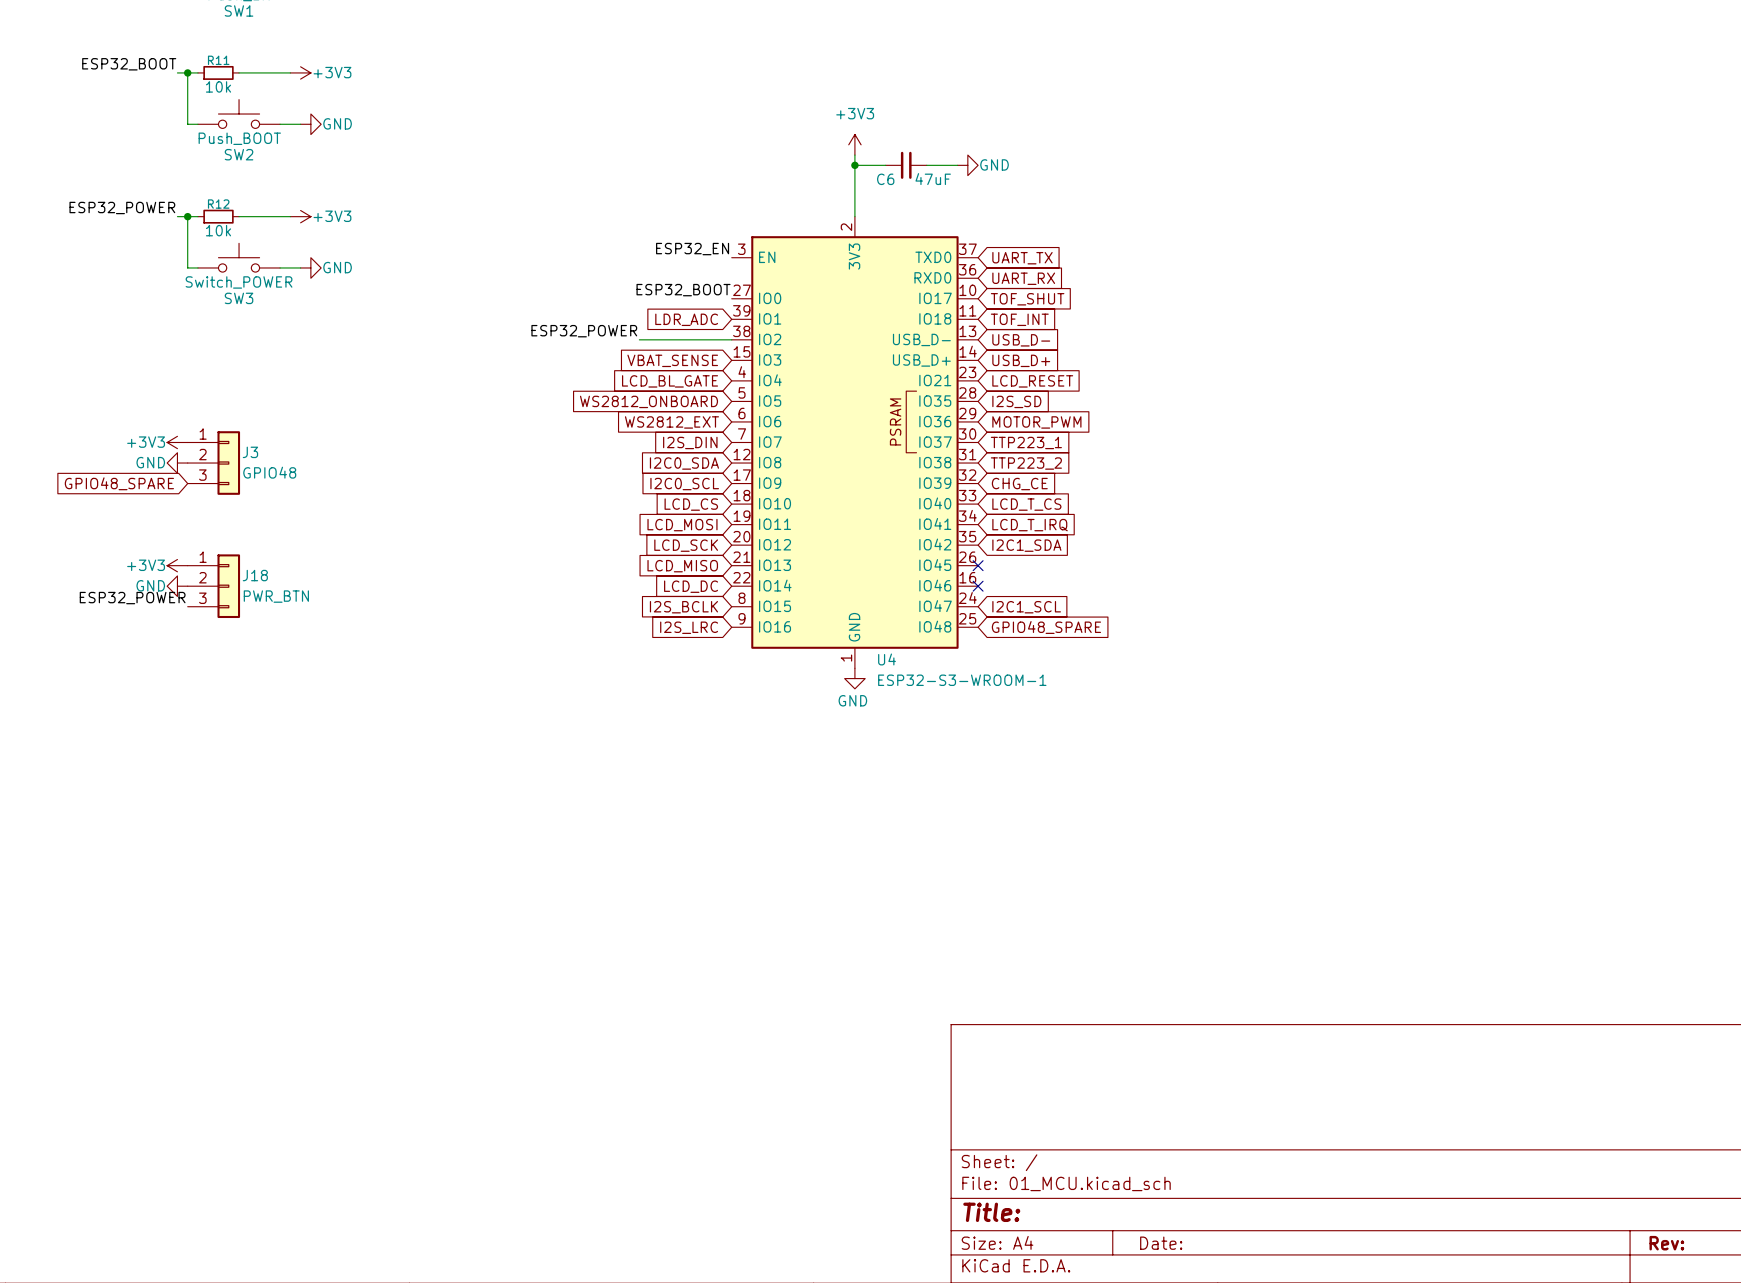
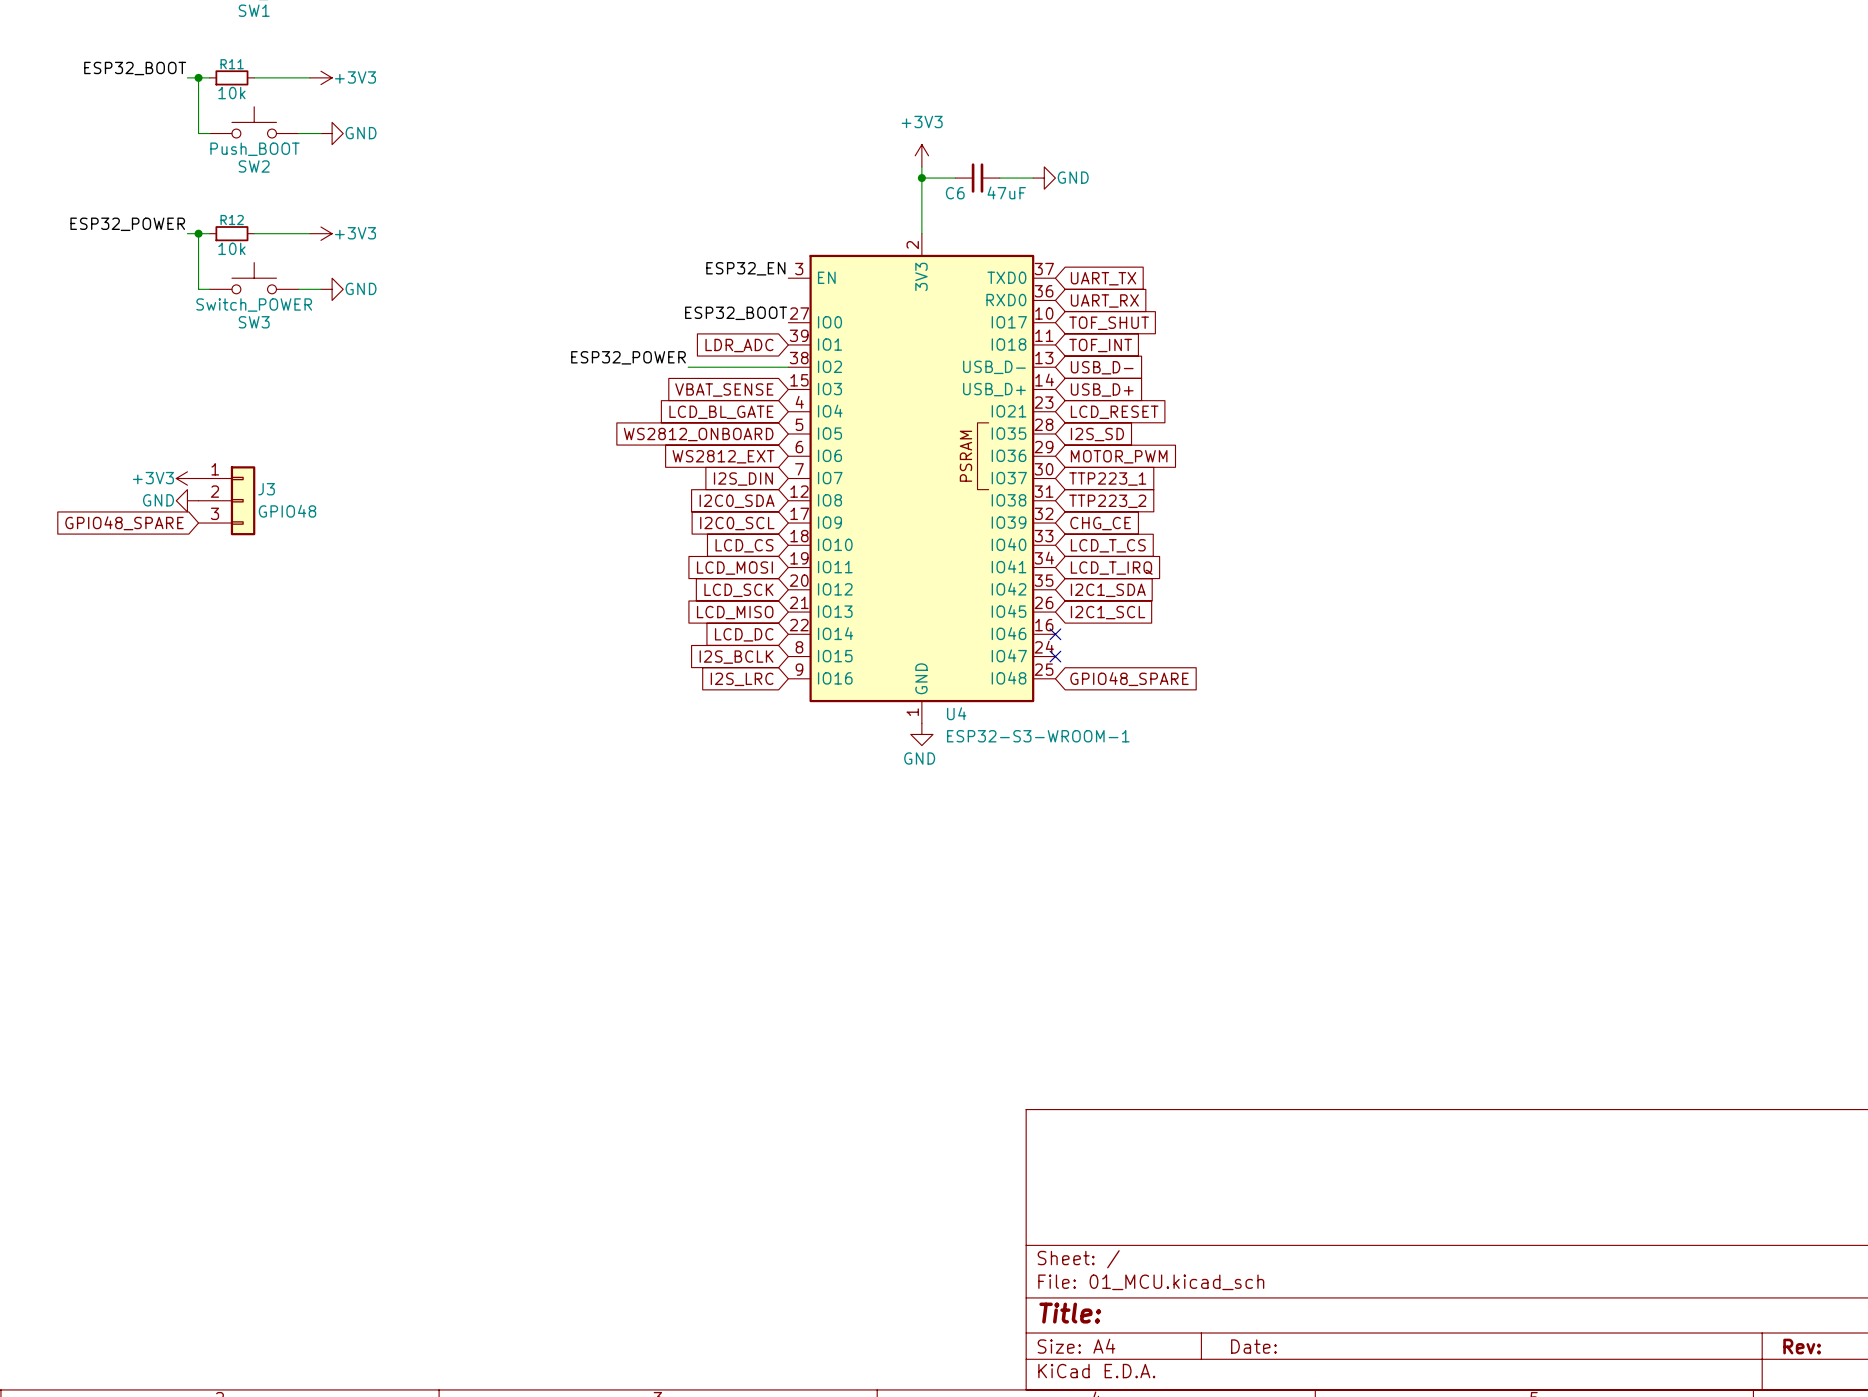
power symbol: +3V3 (177, 565) -> none
no-connect mark position: (978, 565) -> (1055, 656)
power symbol: GND (177, 586) -> none
J18: PWR_BTN (213, 586) -> none
label: ESP32_POWER (132, 598) -> none
global label position: I2C1_SCL (1026, 607) -> I2C1_SCL (1108, 612)

